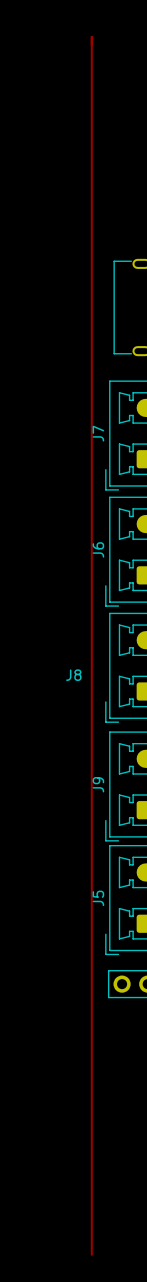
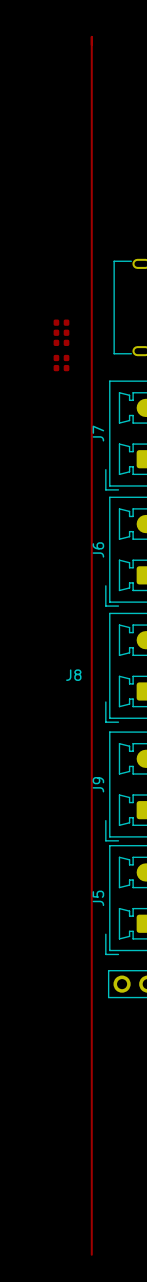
part: none -> (61, 322)
part: none -> (61, 332)
part: none -> (61, 342)
part: none -> (61, 358)
part: none -> (61, 368)

